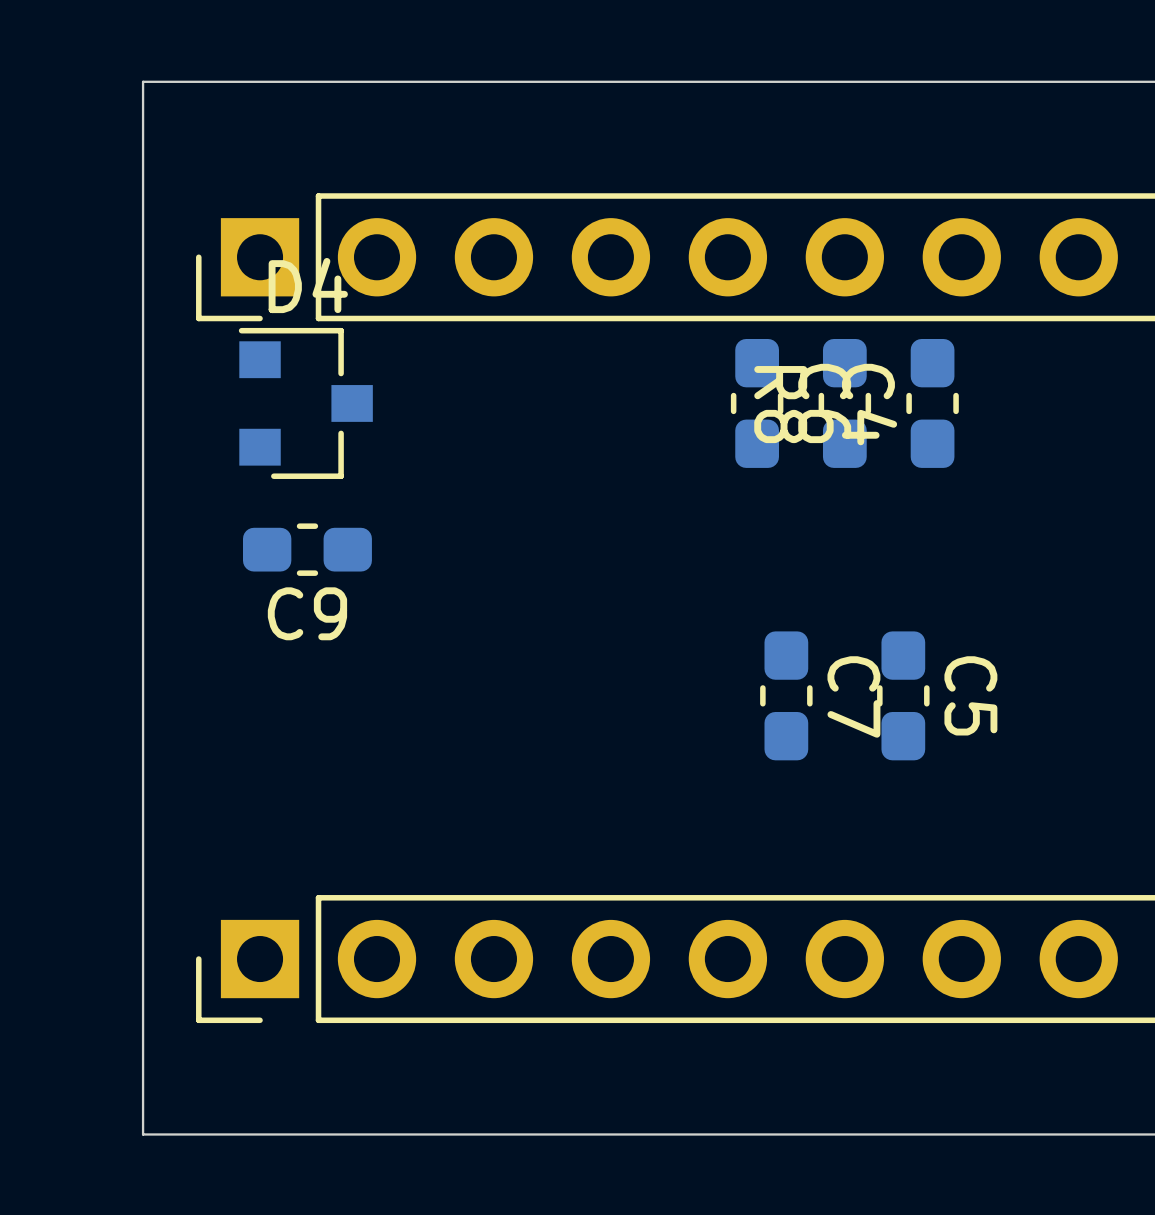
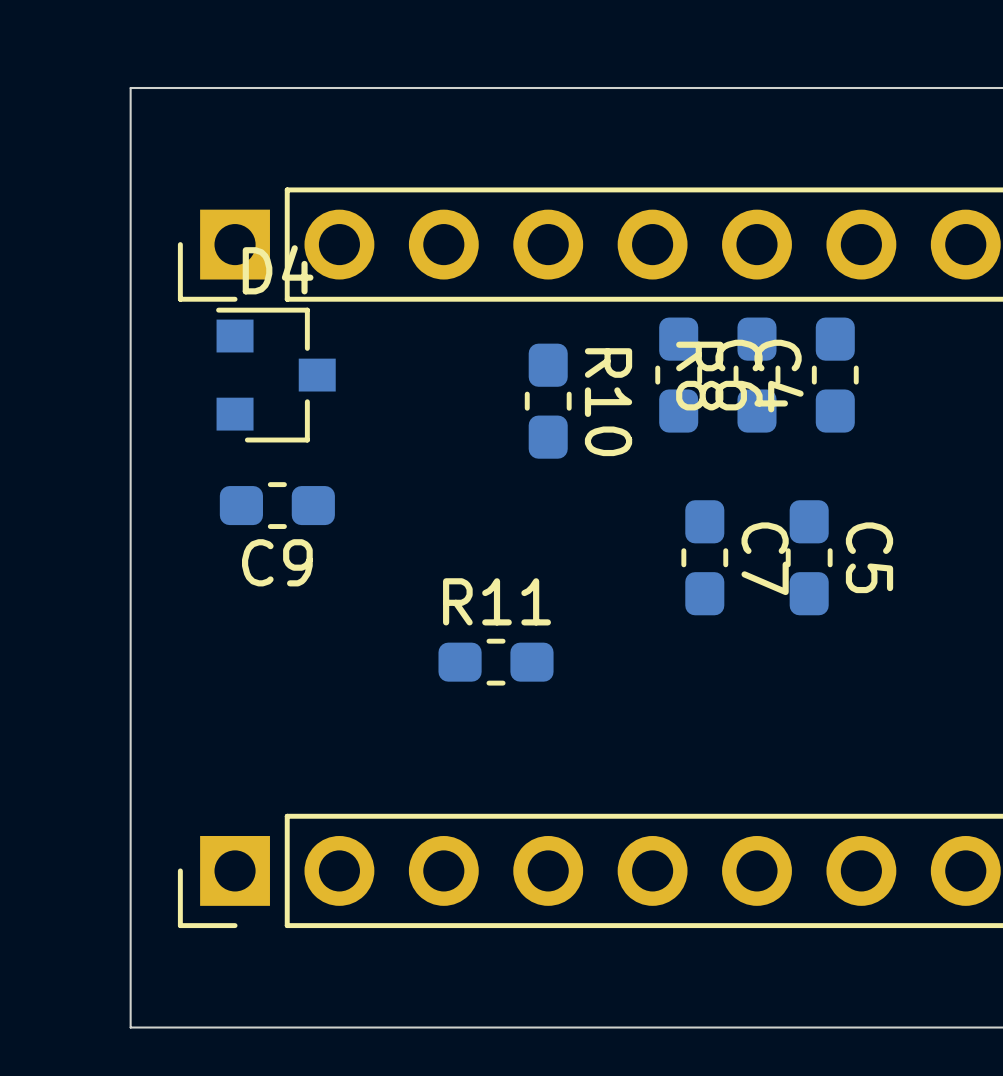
R10: none -> (548, 401)
C7 position: (786, 695) -> (704, 557)
C5 position: (903, 695) -> (809, 557)
R11: none -> (496, 662)

